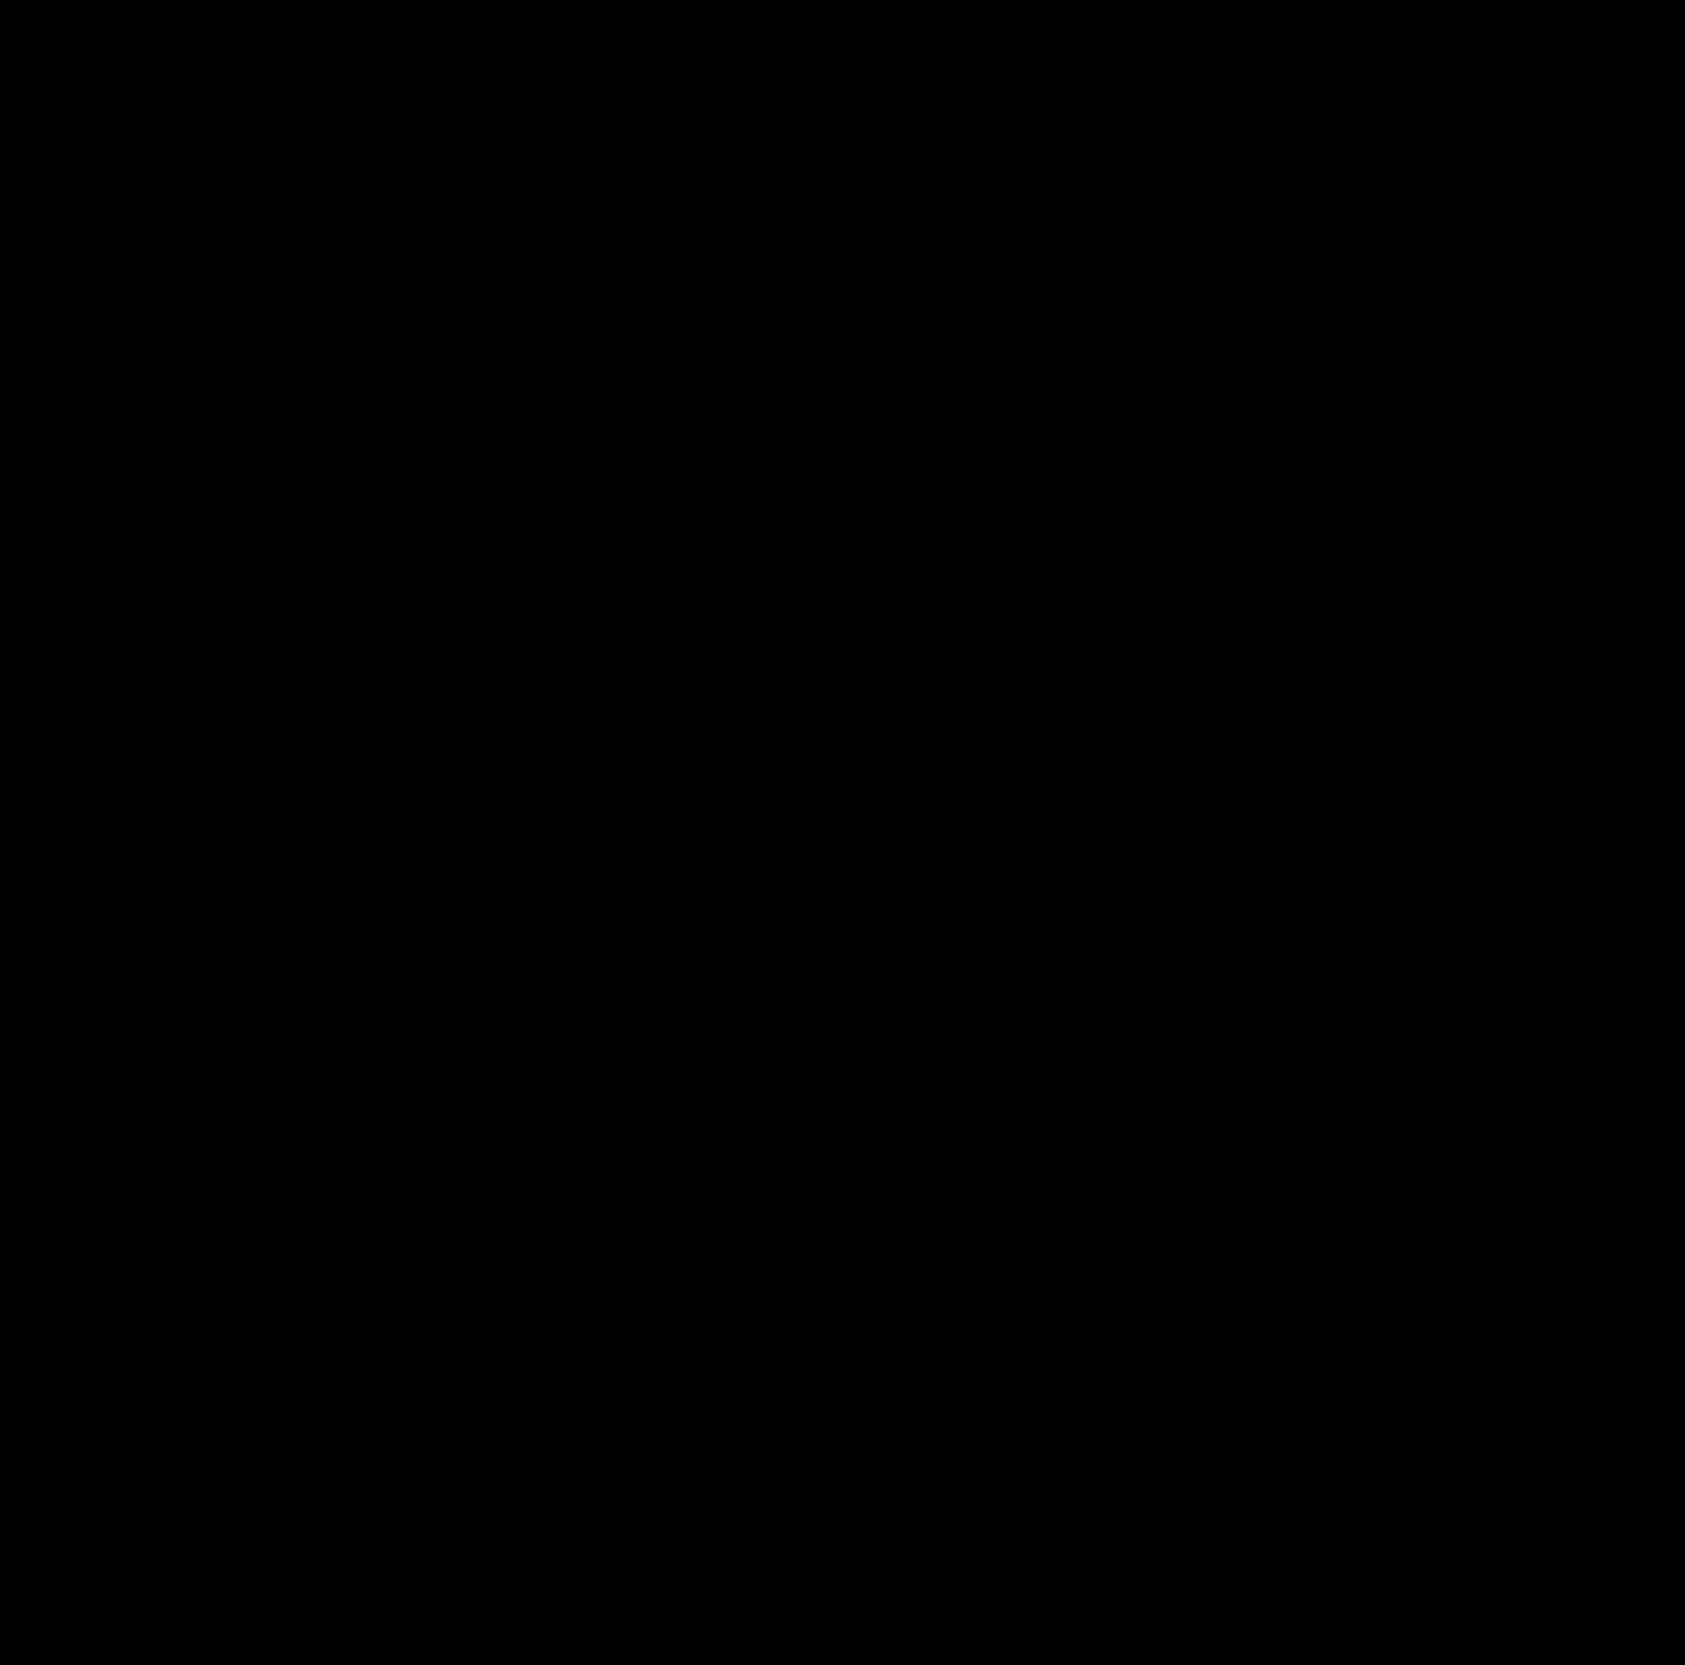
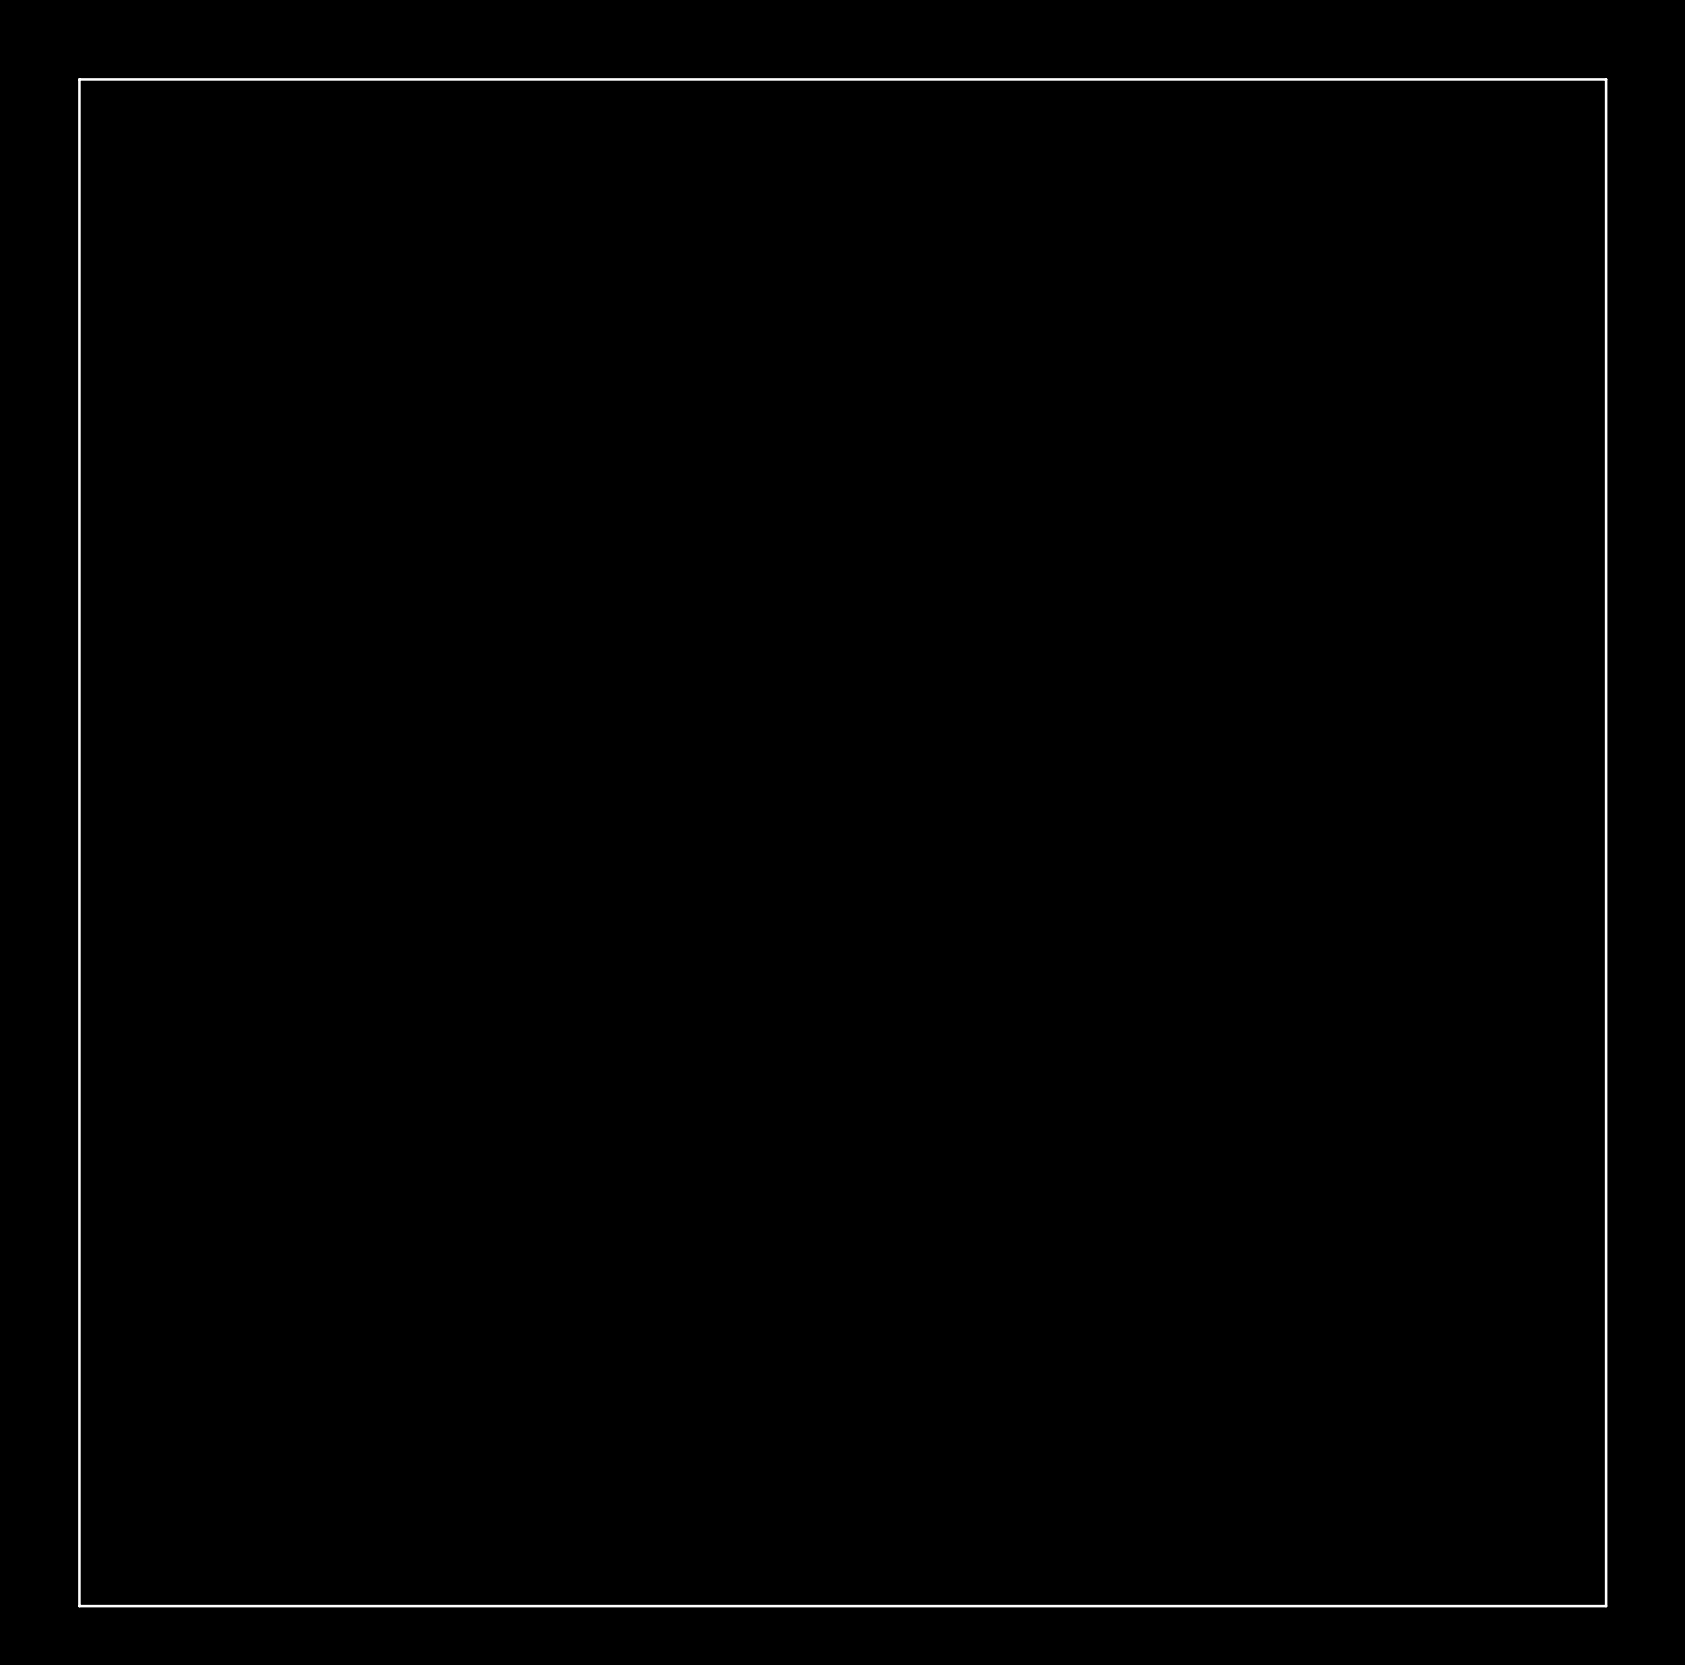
board edge: none -> (79, 79) (1606, 79) (1606, 1606) (79, 1606) (79, 79)

